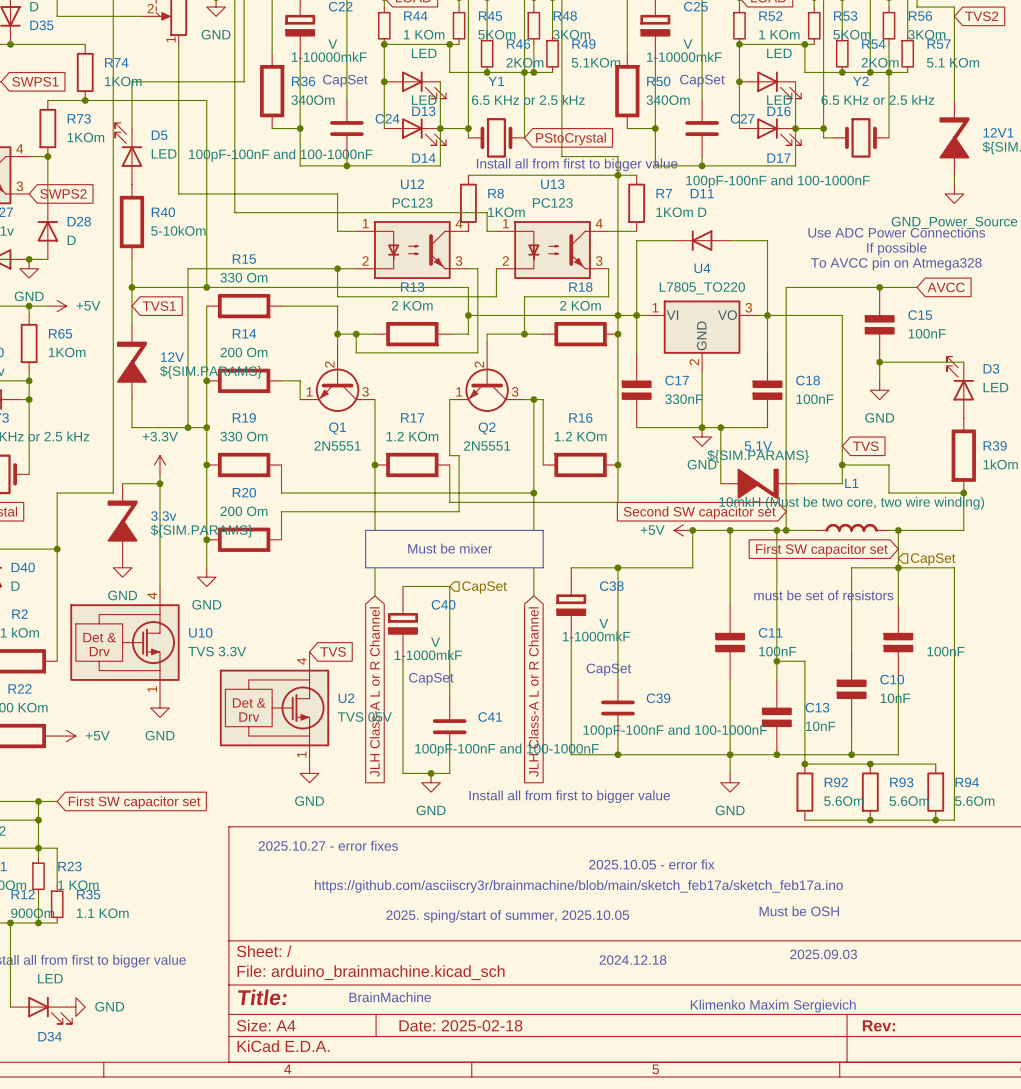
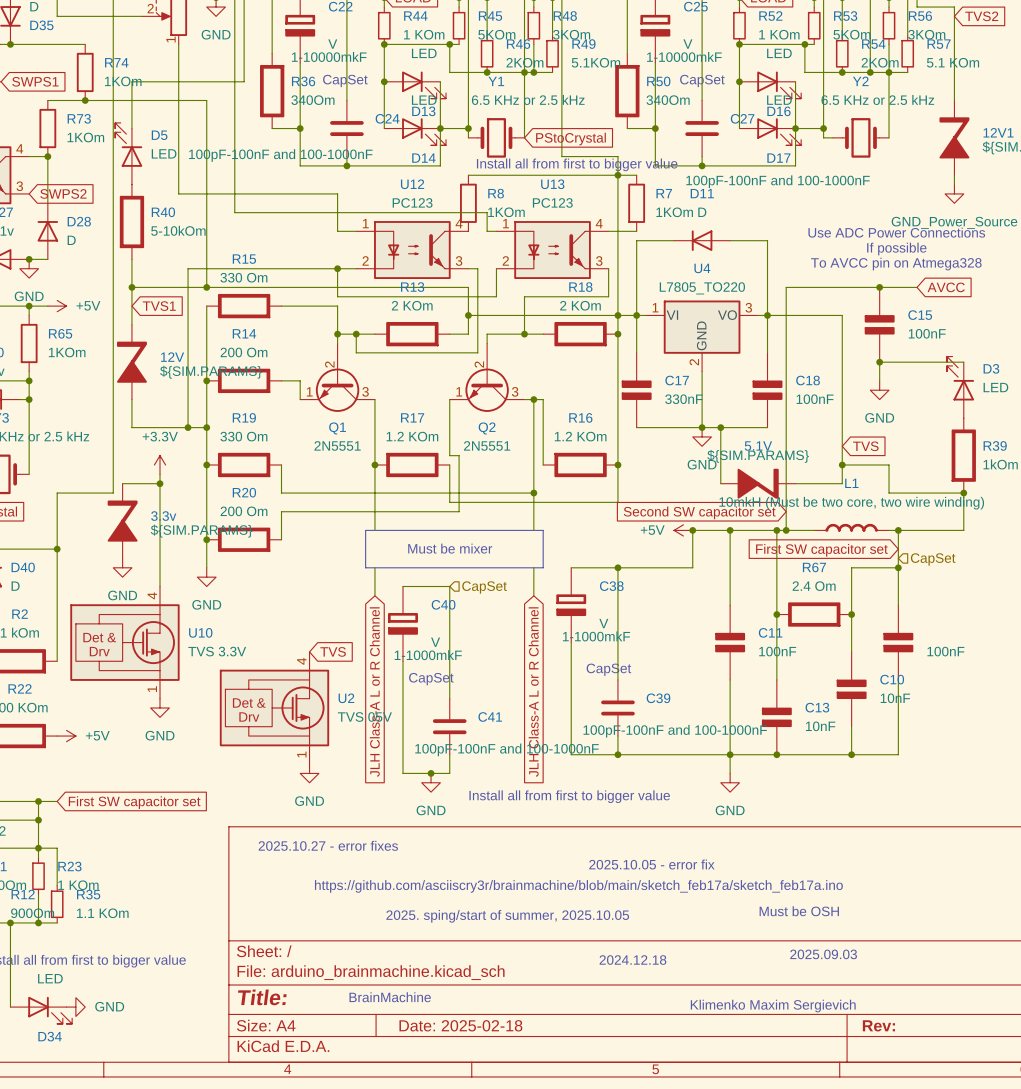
wire: (898, 567) (954, 567) (954, 820) (804, 820) -> none
text: must be set of resistors (823, 595) -> none
junction: none -> (776, 614)
R67: none -> 2.4 Om (814, 614)
junction: none -> (851, 614)
wire: (776, 661) (804, 661) (804, 764) (935, 764) -> none
junction: (776, 661) -> none
junction: (804, 764) -> none
junction: (870, 764) -> none
R92: 5.6Om (804, 792) -> none
R93: 5.6Om (870, 792) -> none
R94: 5.6Om (935, 792) -> none
junction: (870, 820) -> none
junction: (935, 820) -> none

